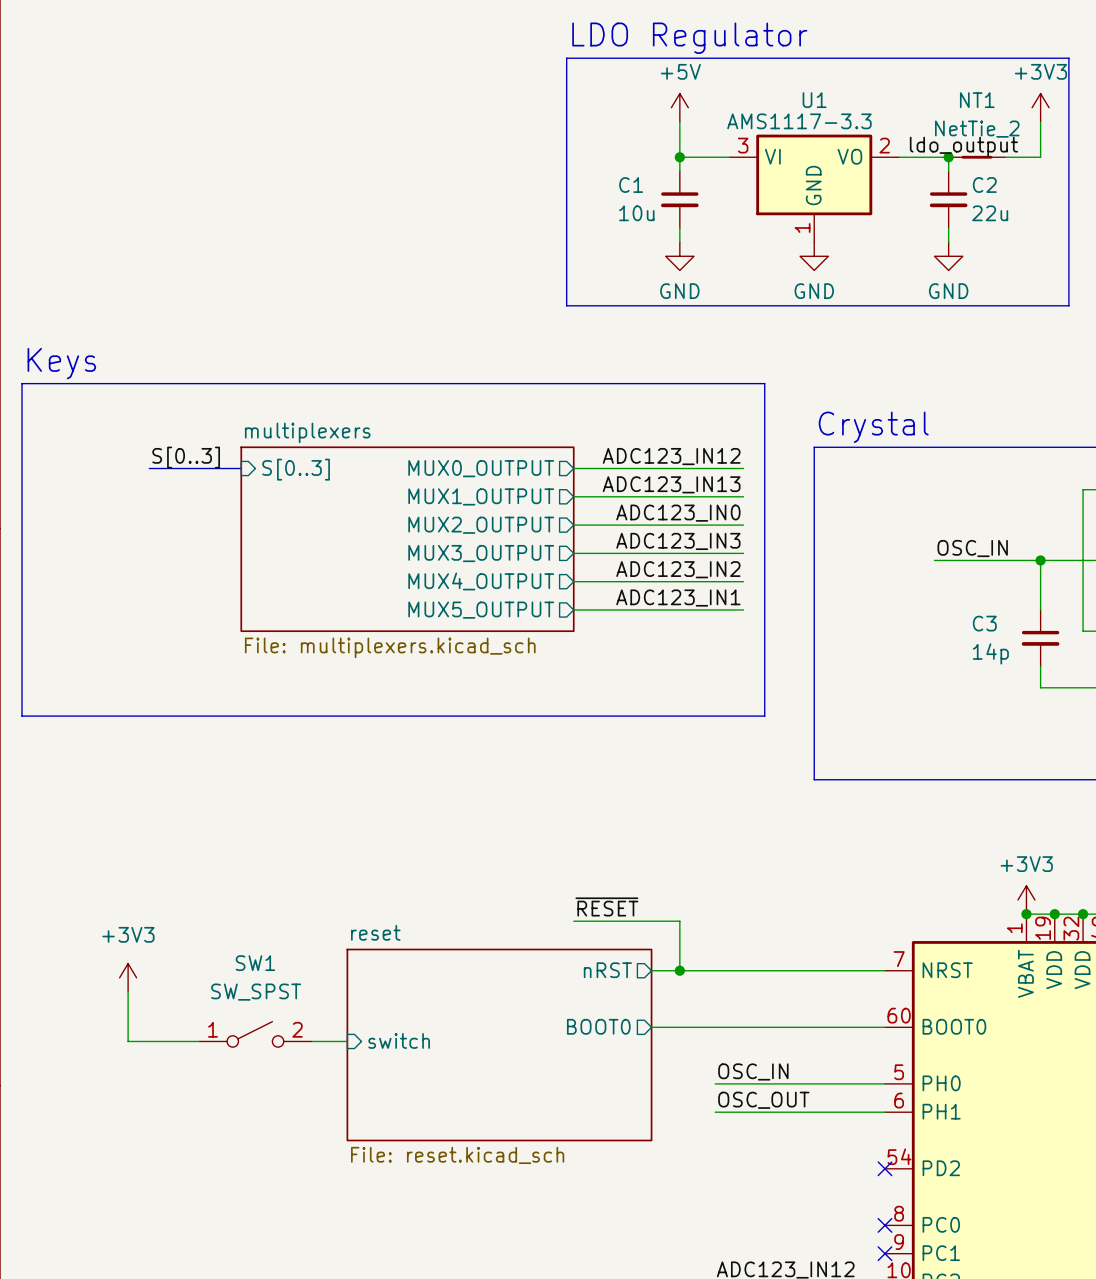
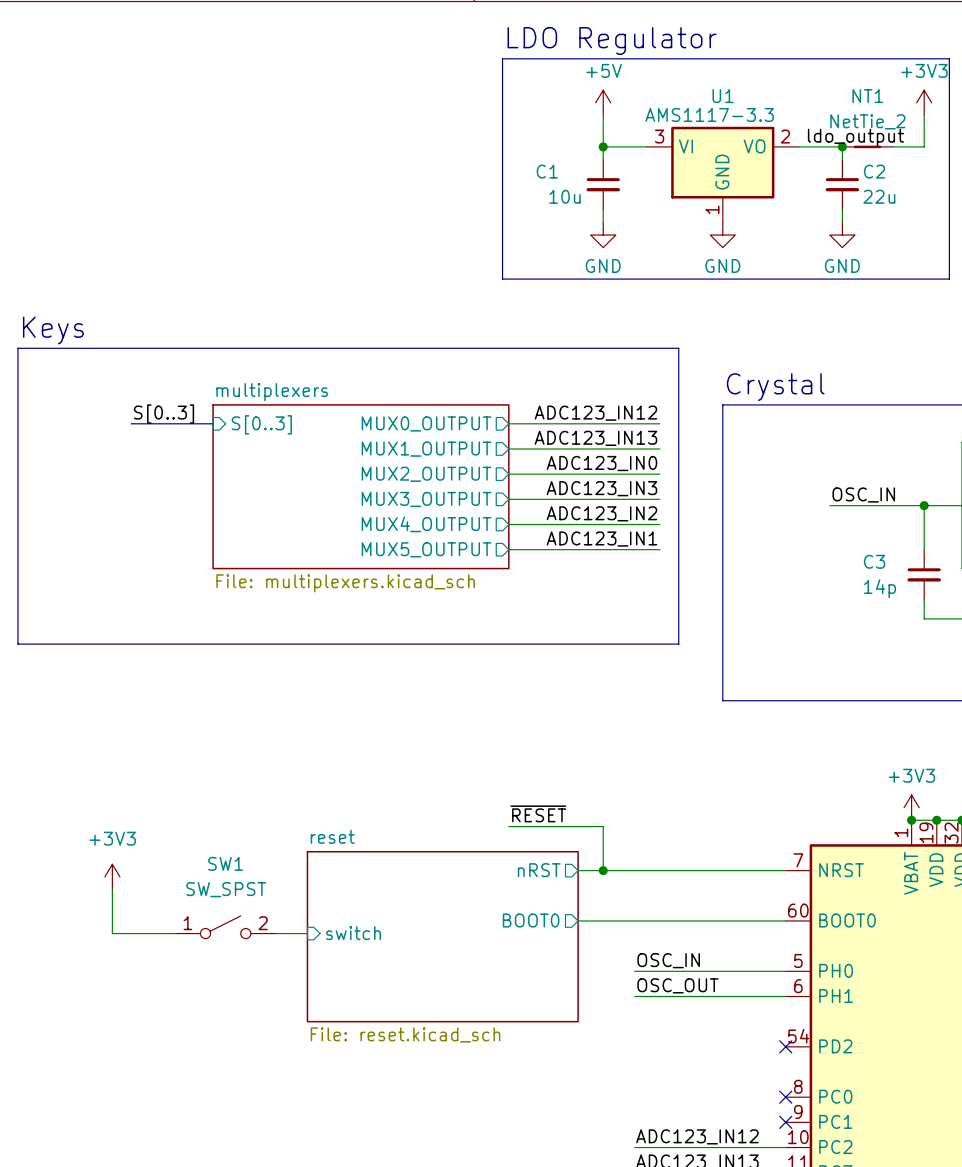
C1 name position: C1 (631, 185) -> C1 (547, 171)

